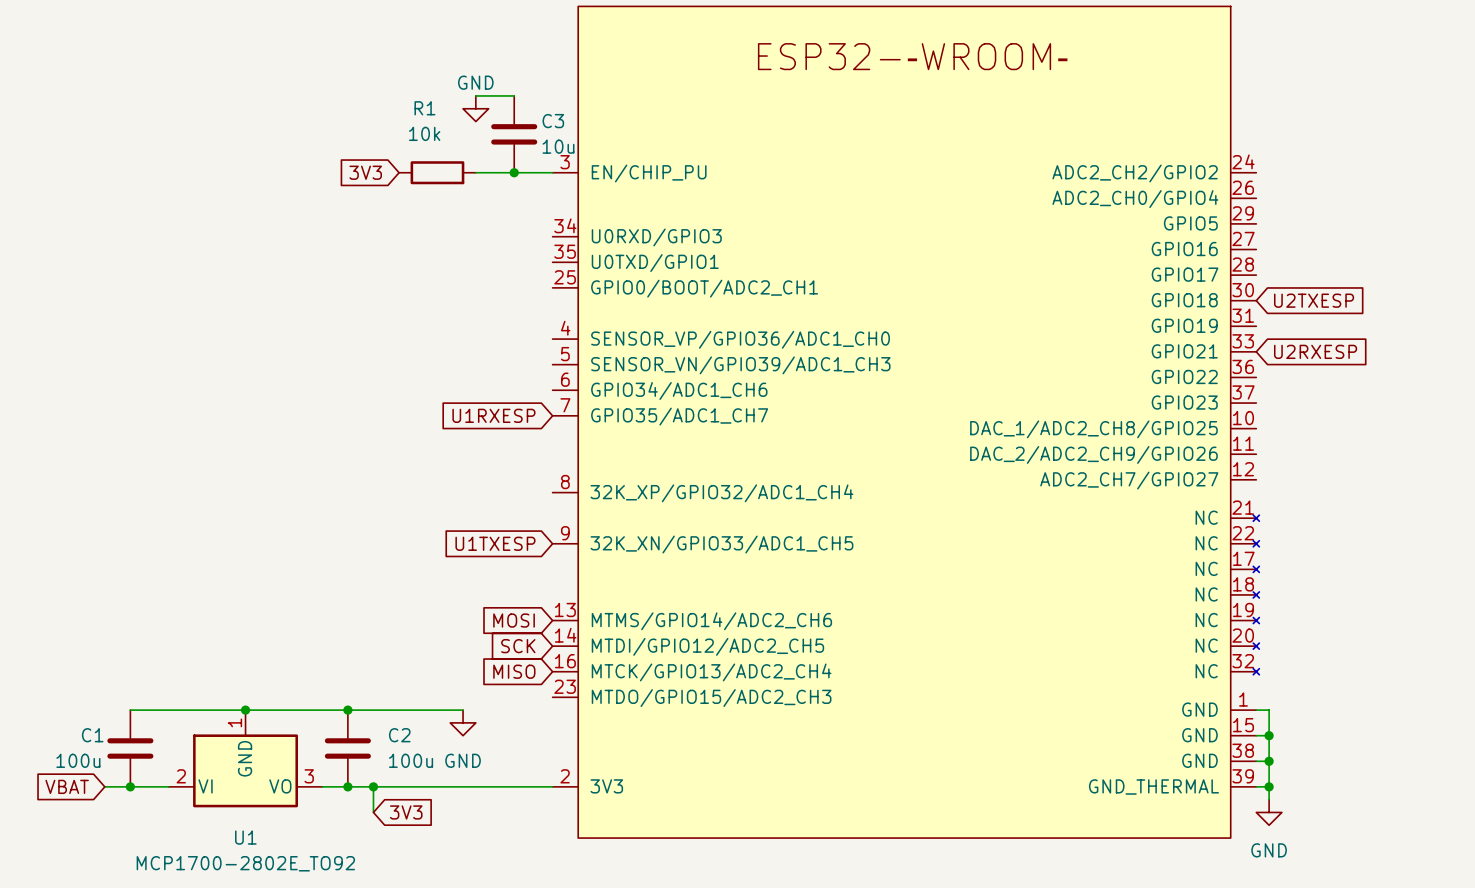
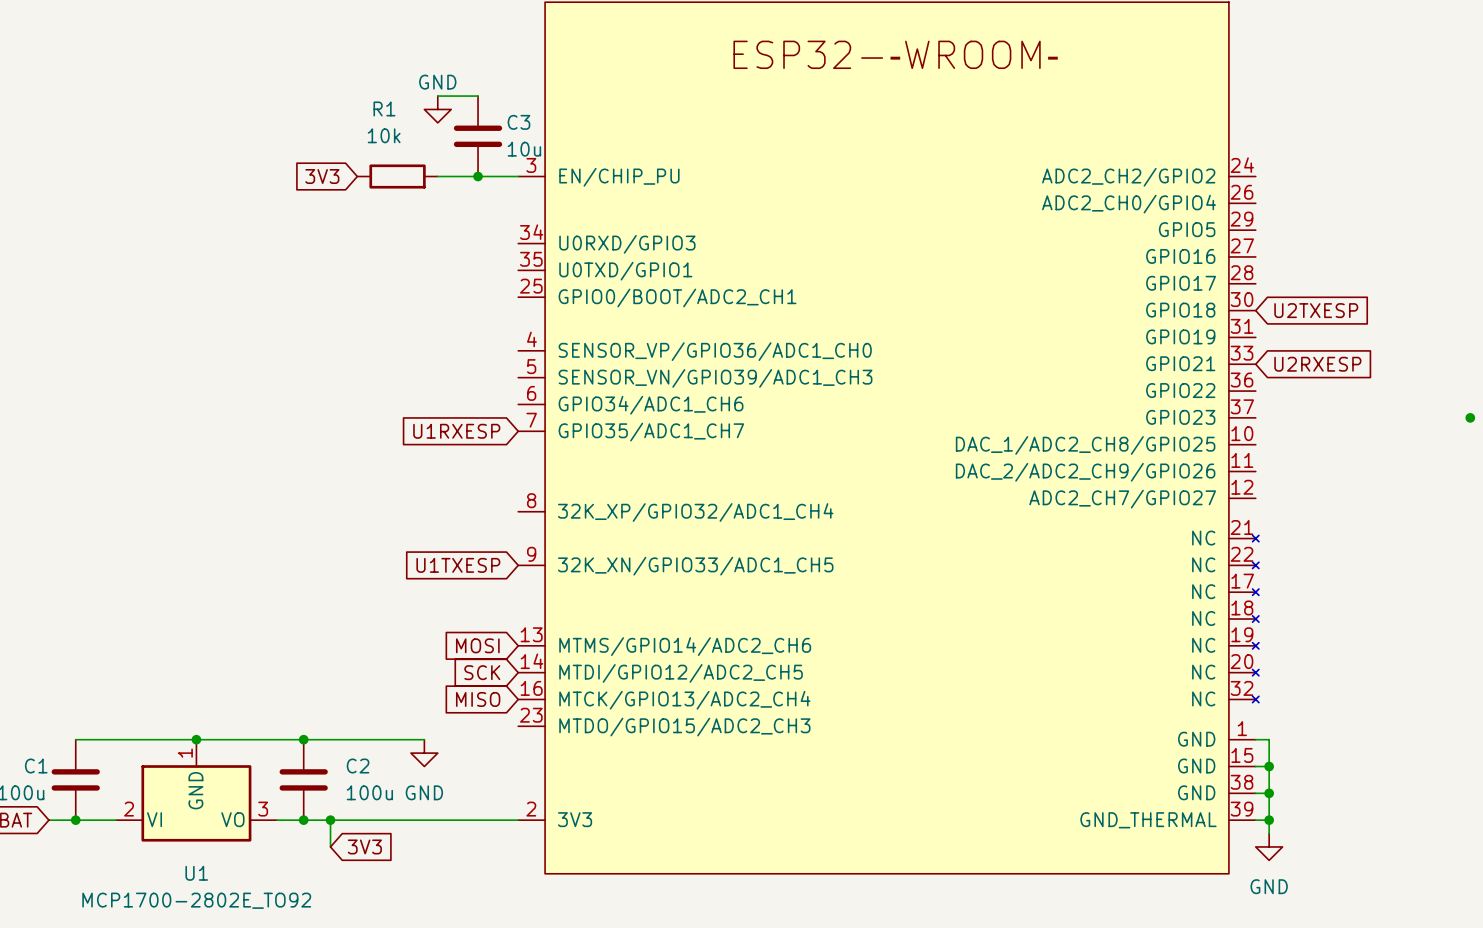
junction: none -> (1470, 417)

